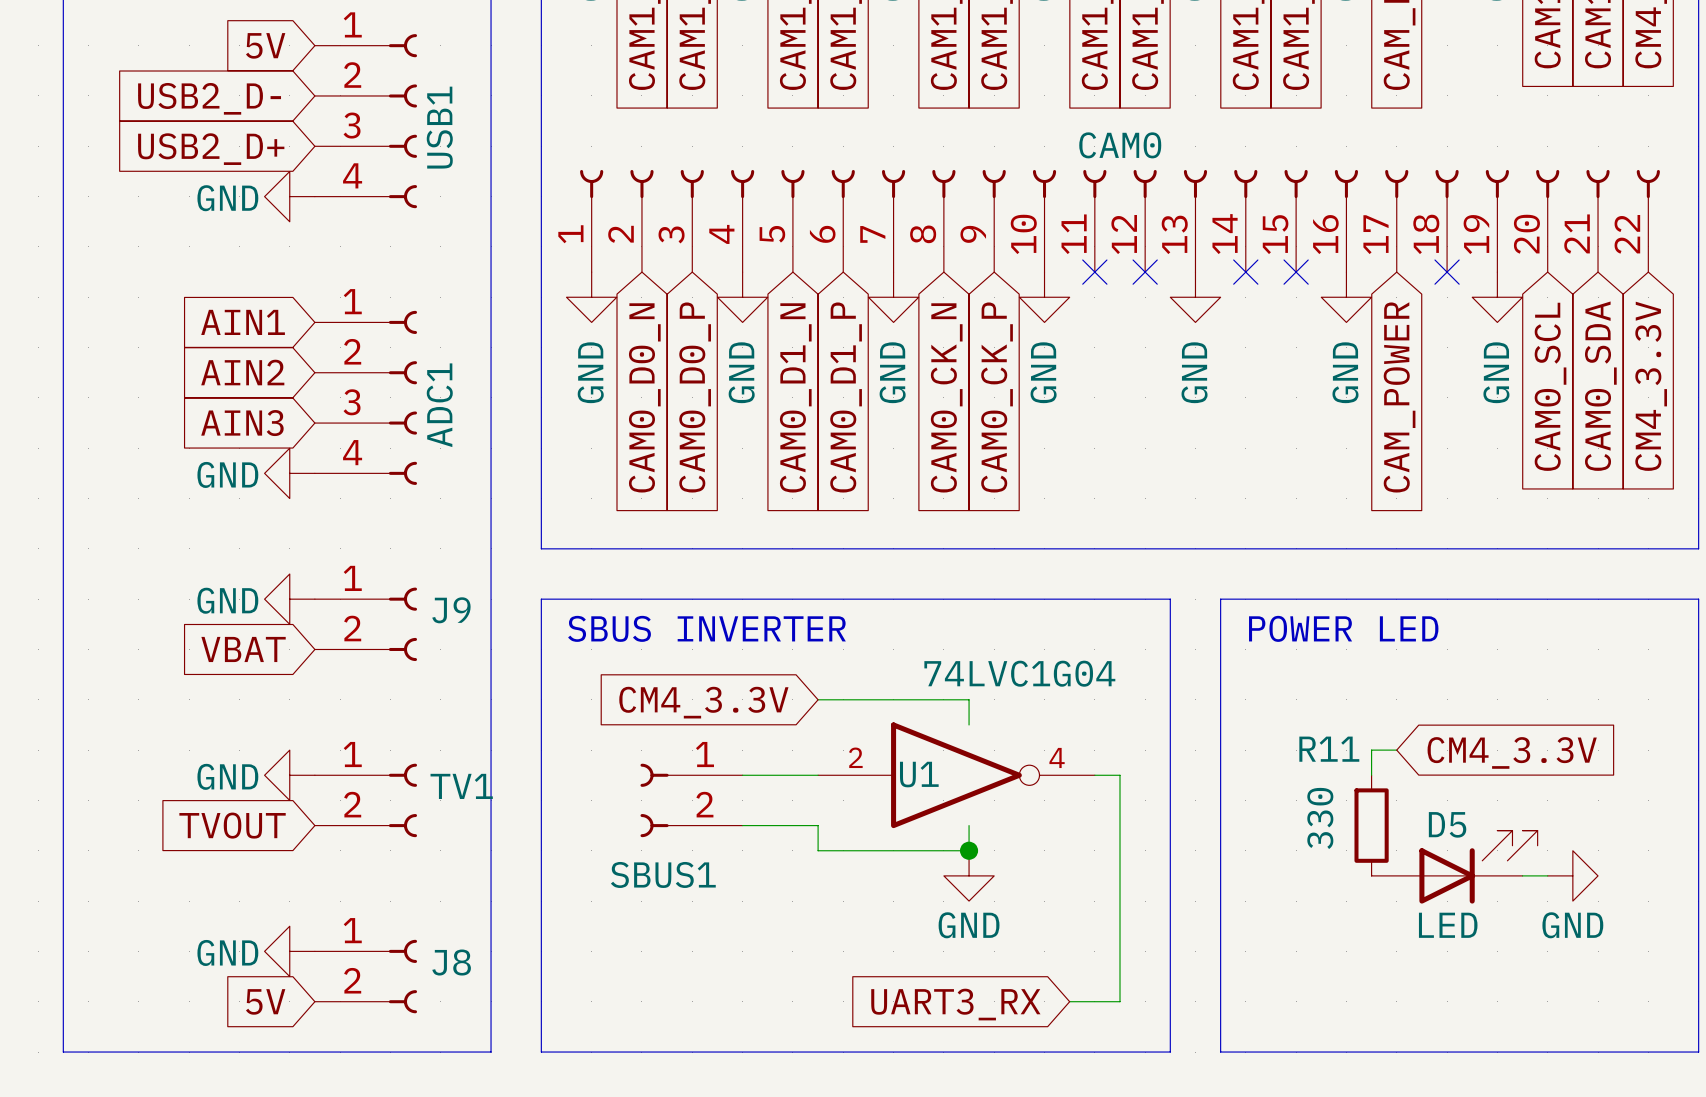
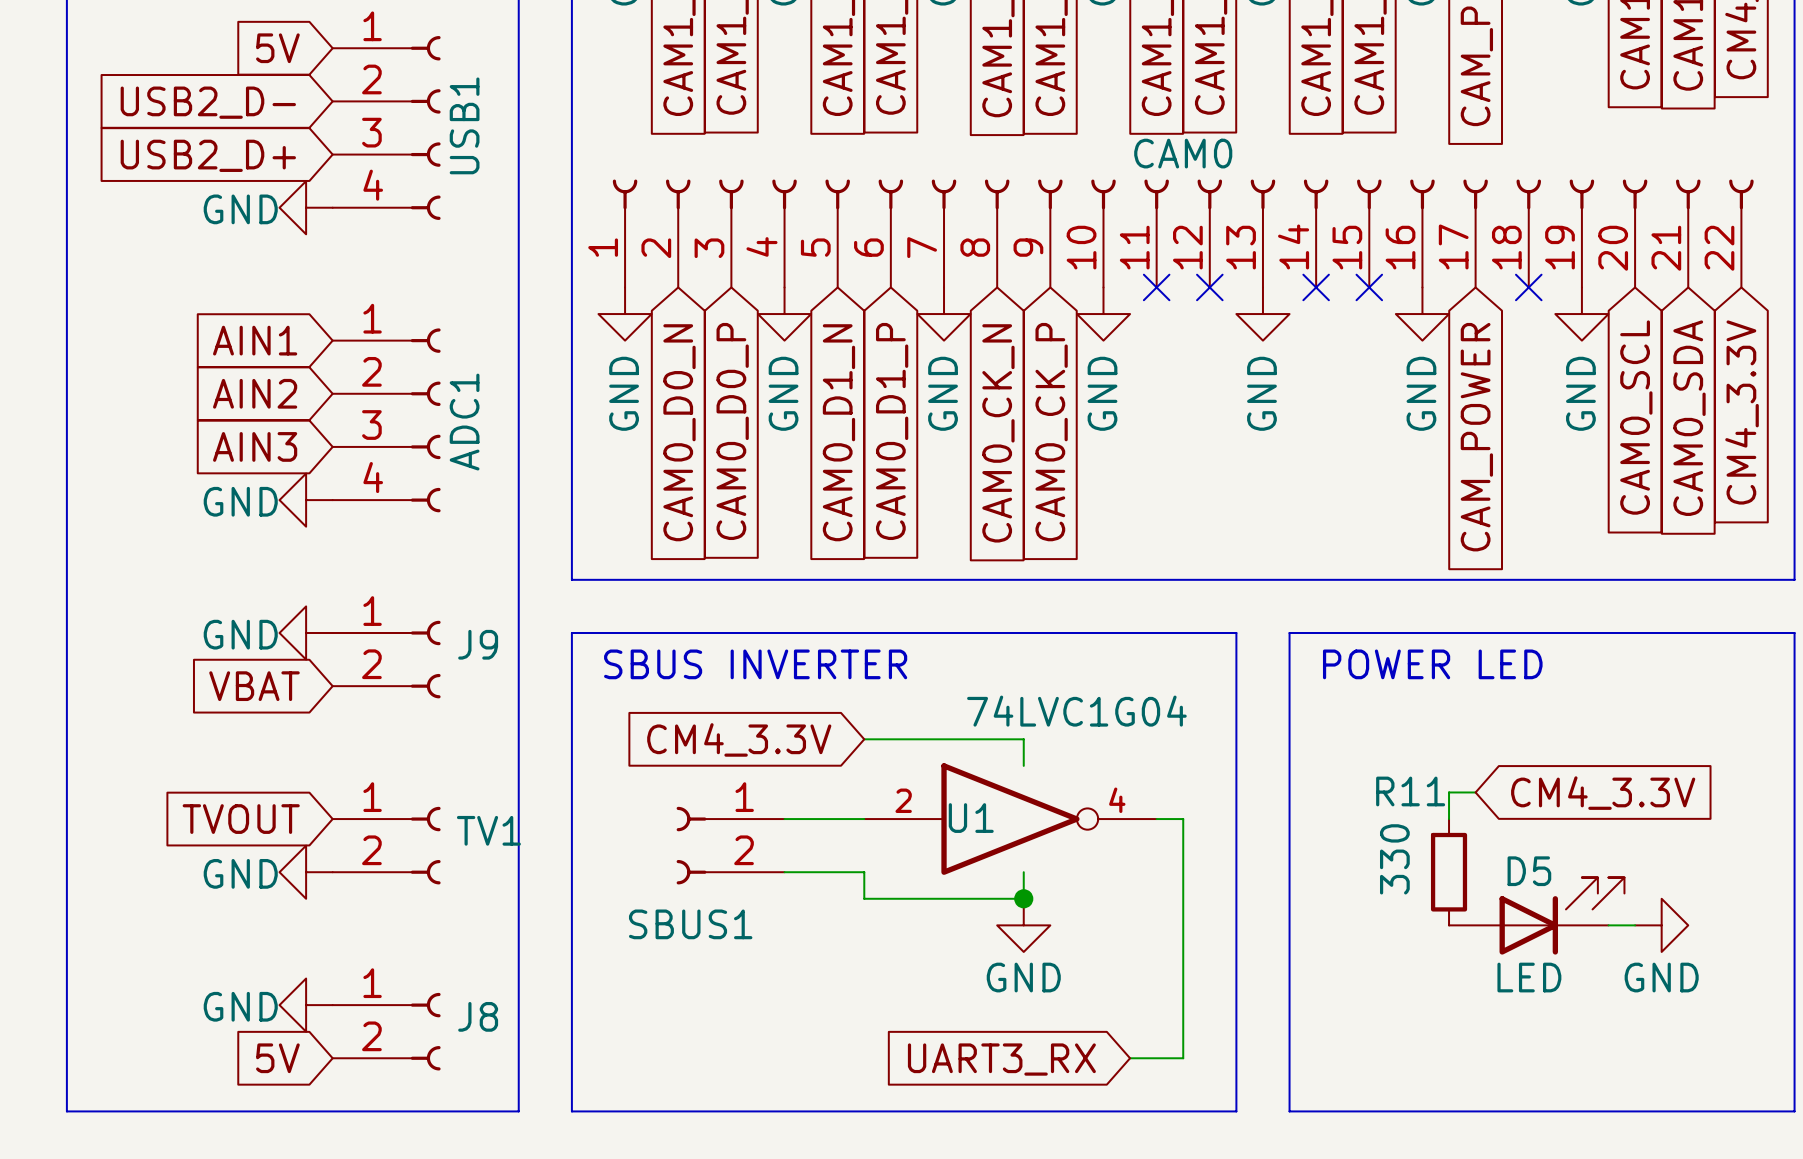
power symbol position: GND (289, 775) -> GND (306, 872)
global label position: TVOUT (232, 825) -> TVOUT (241, 819)

